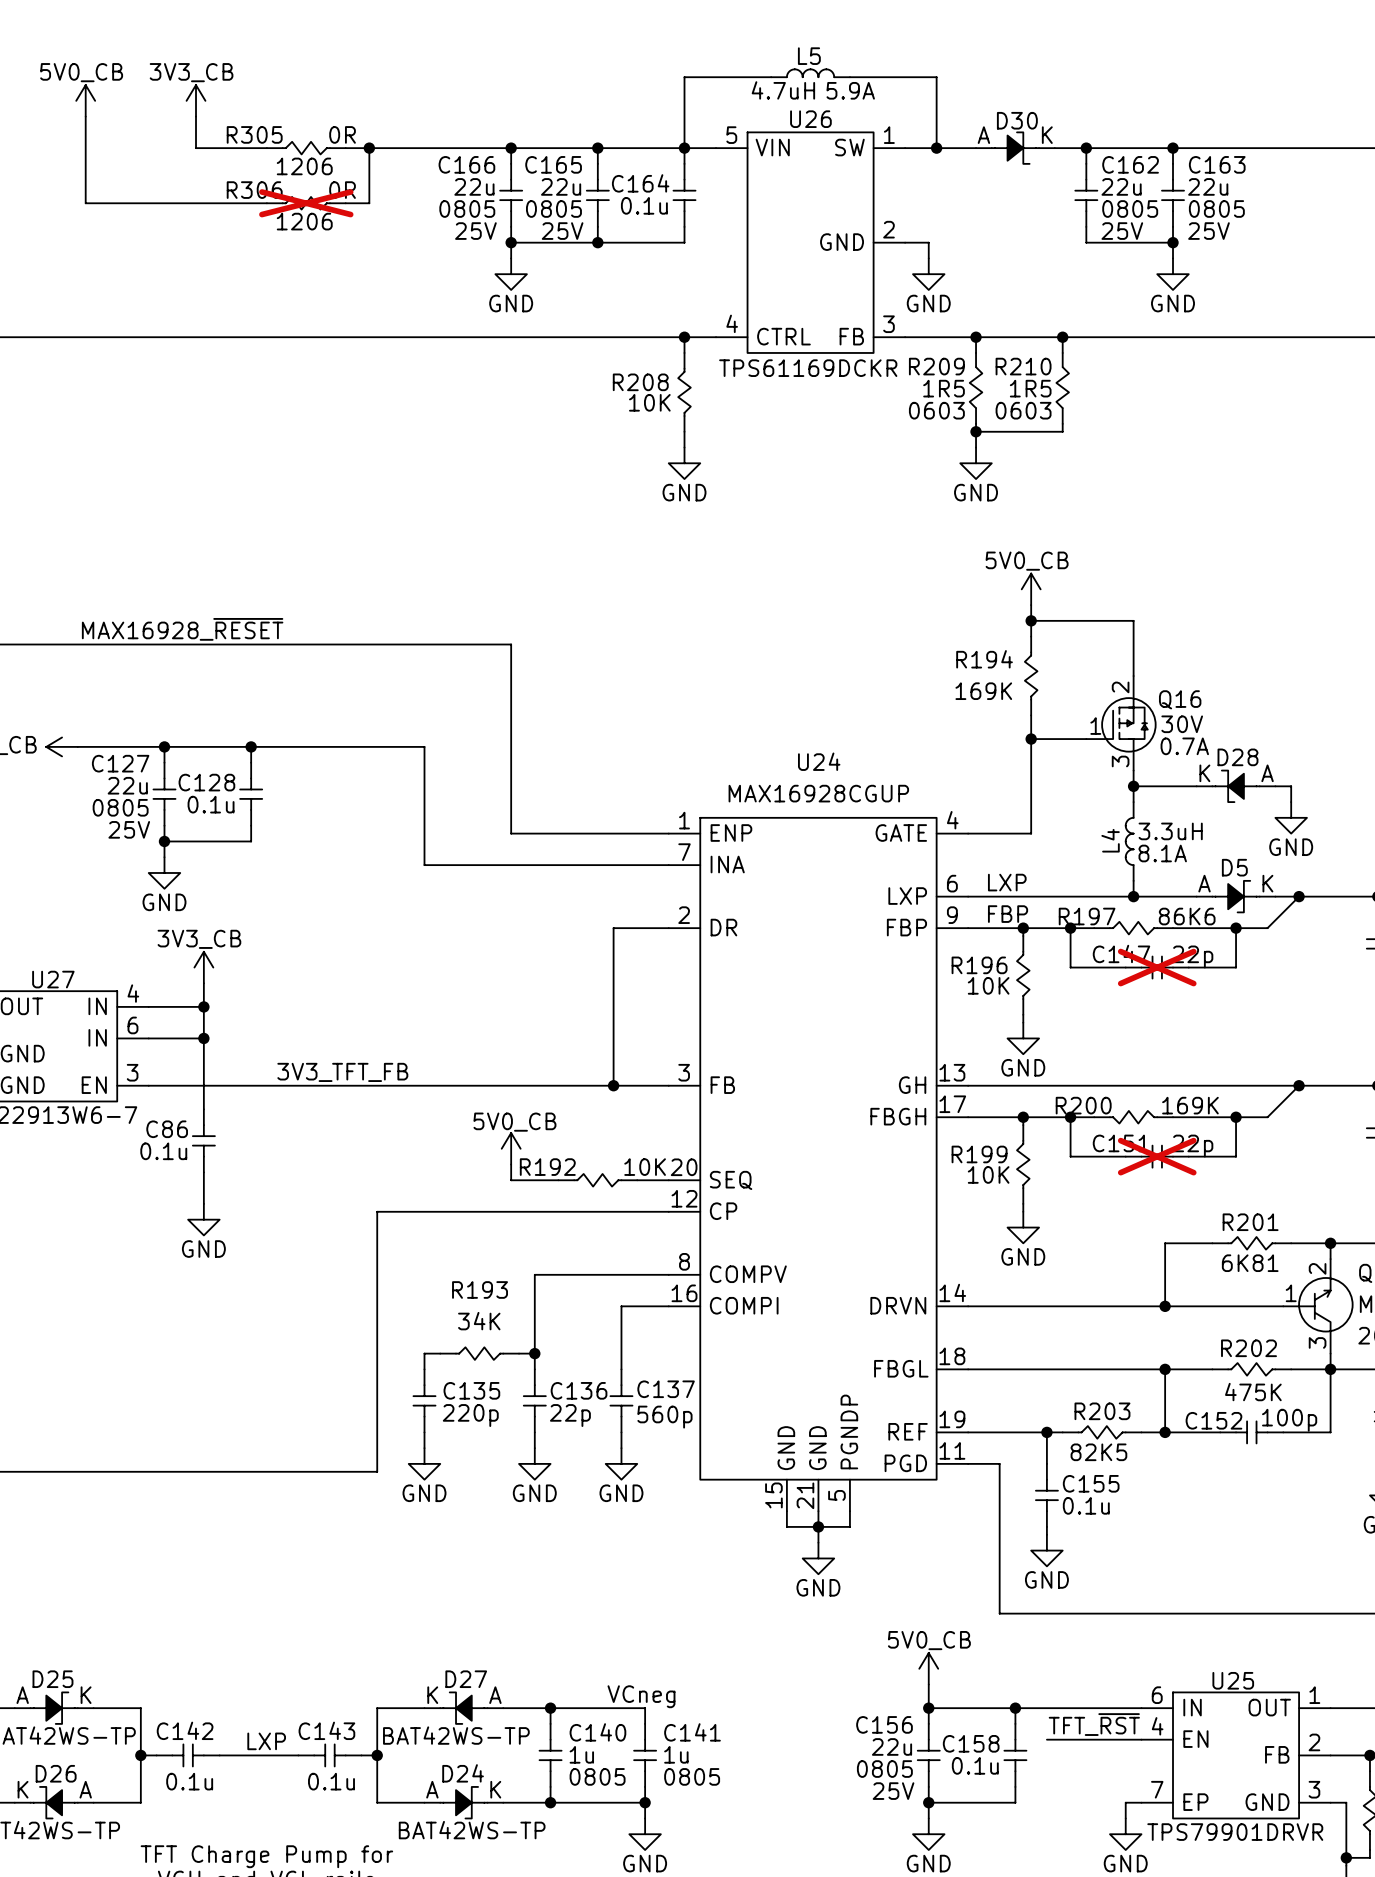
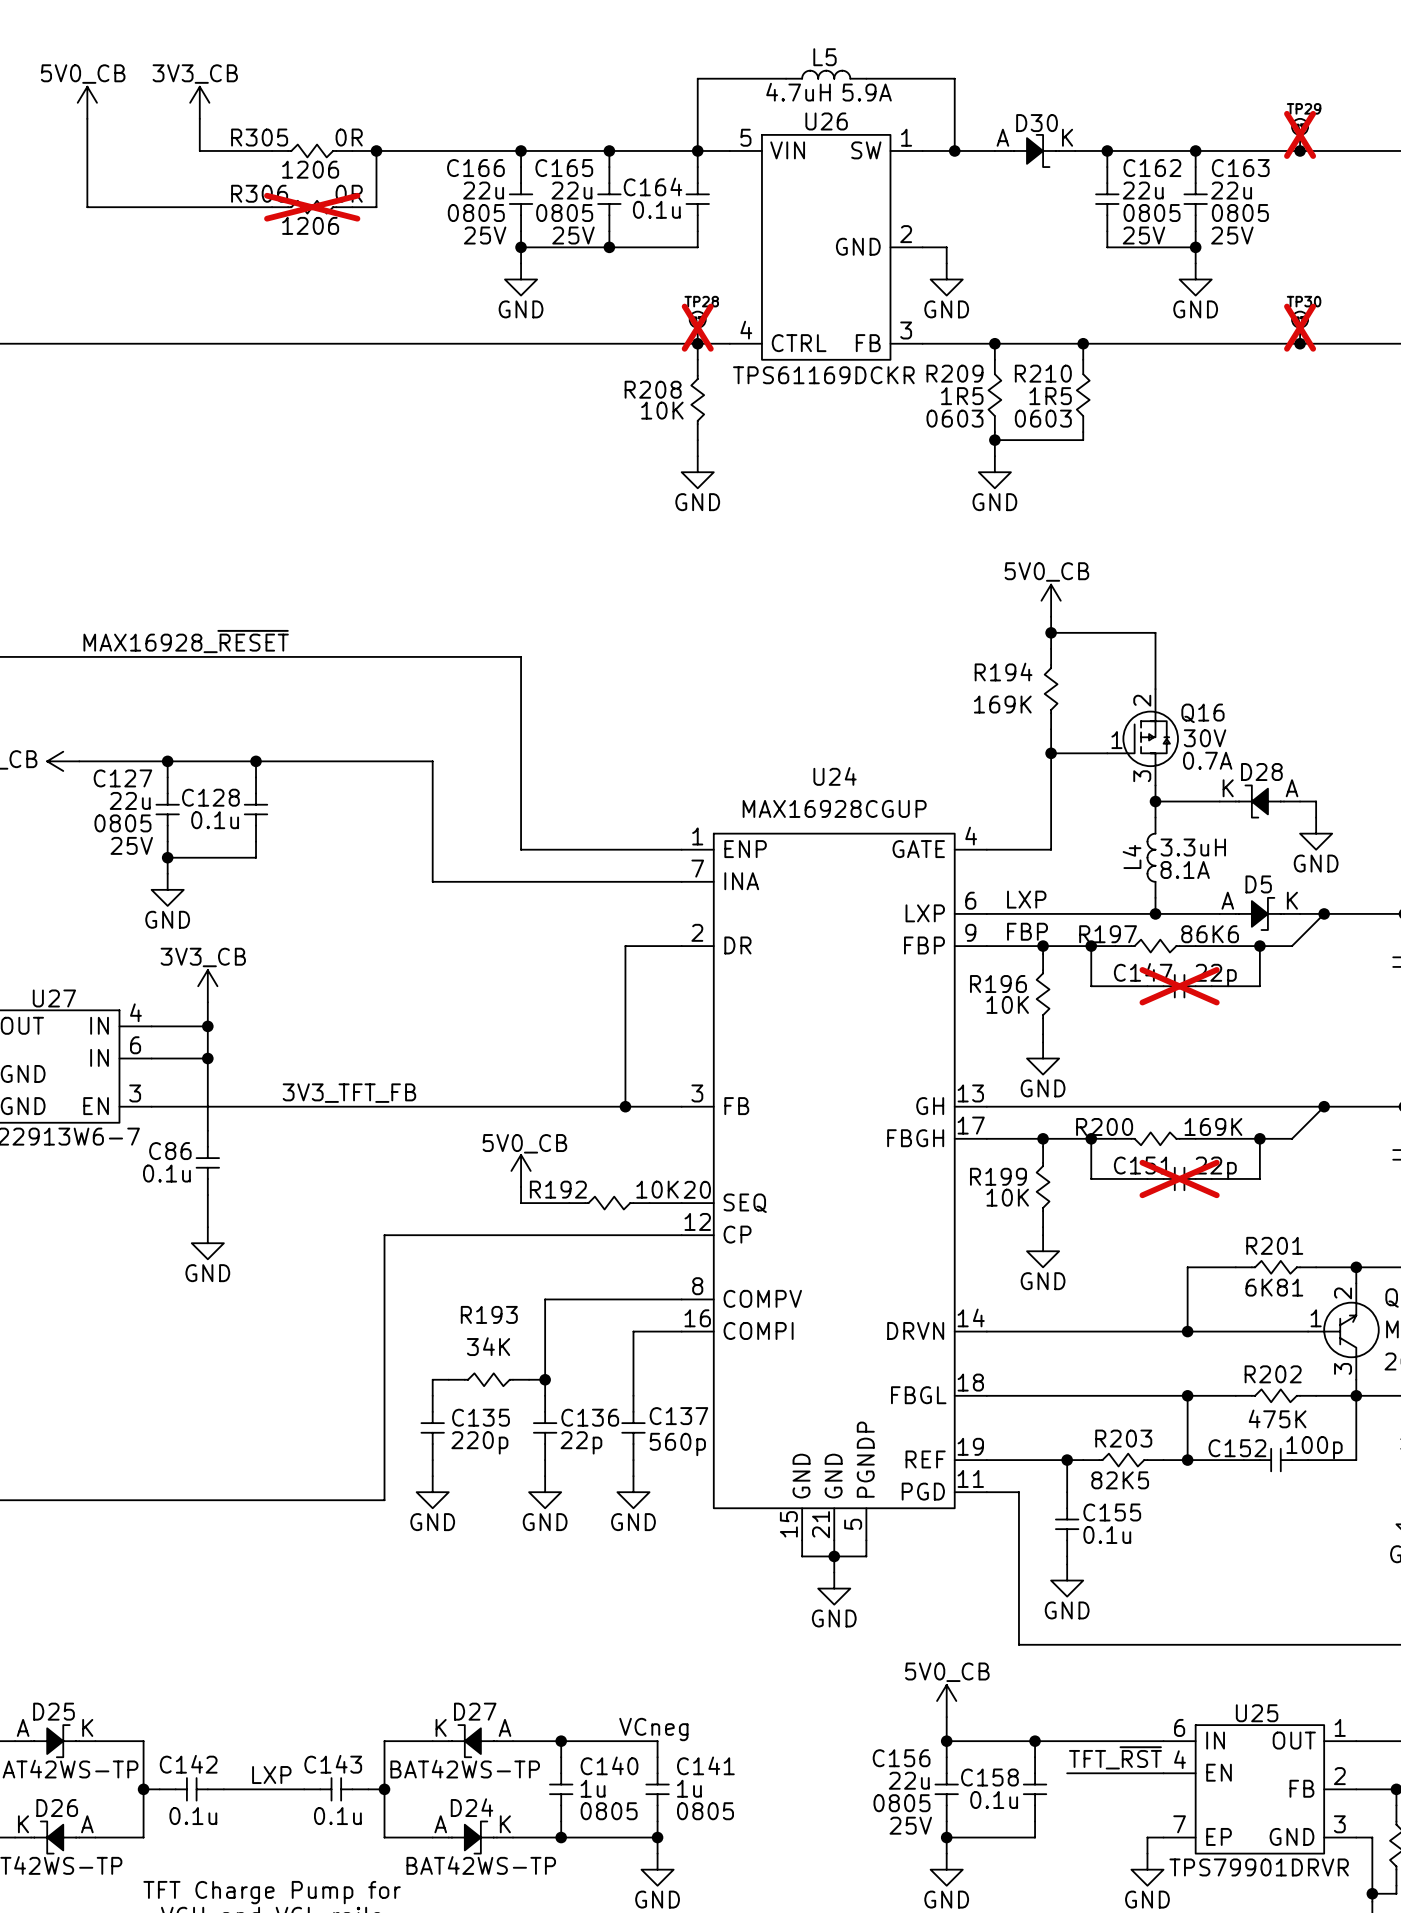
TP29: none -> (1300, 134)
junction: none -> (1300, 150)
TP28: none -> (697, 327)
TP30: none -> (1300, 327)
junction: none -> (1300, 343)

